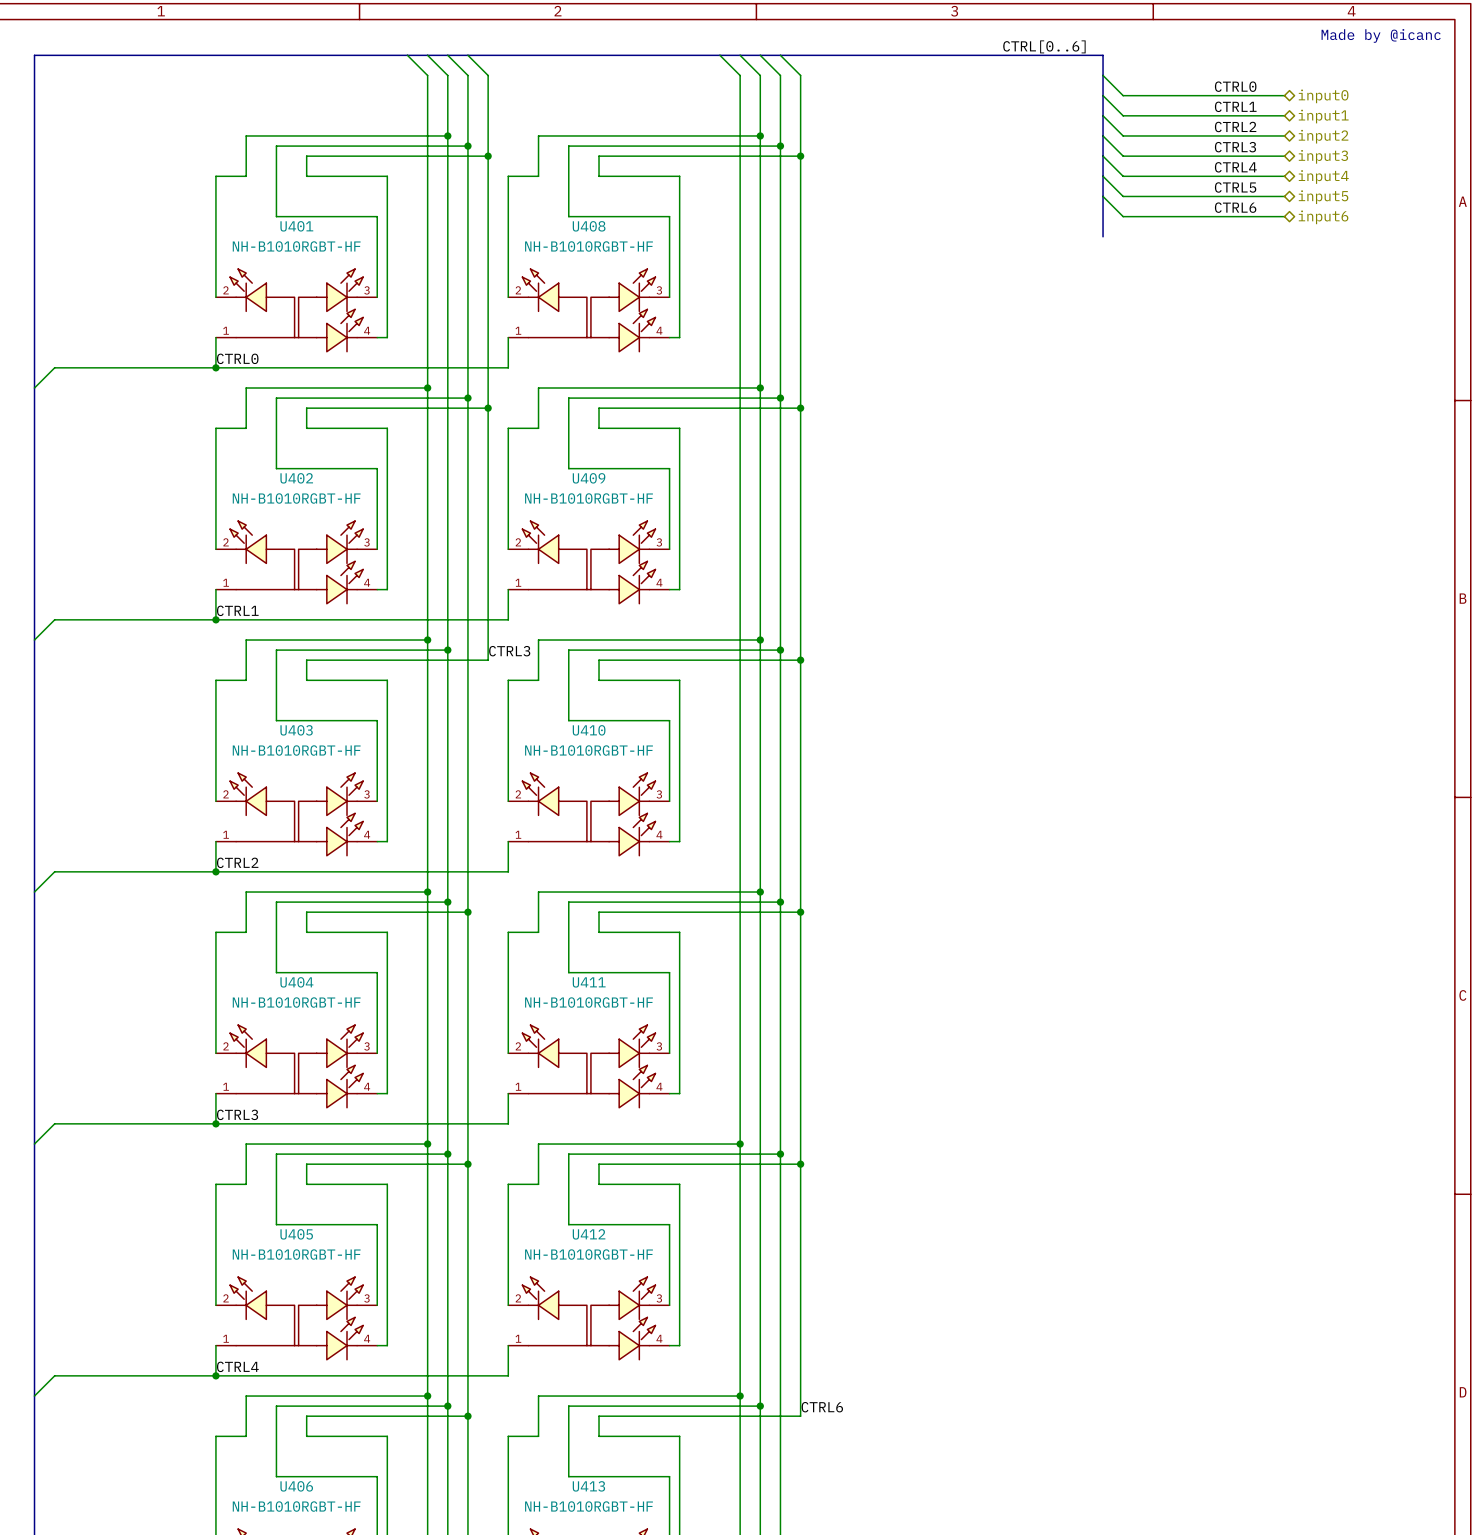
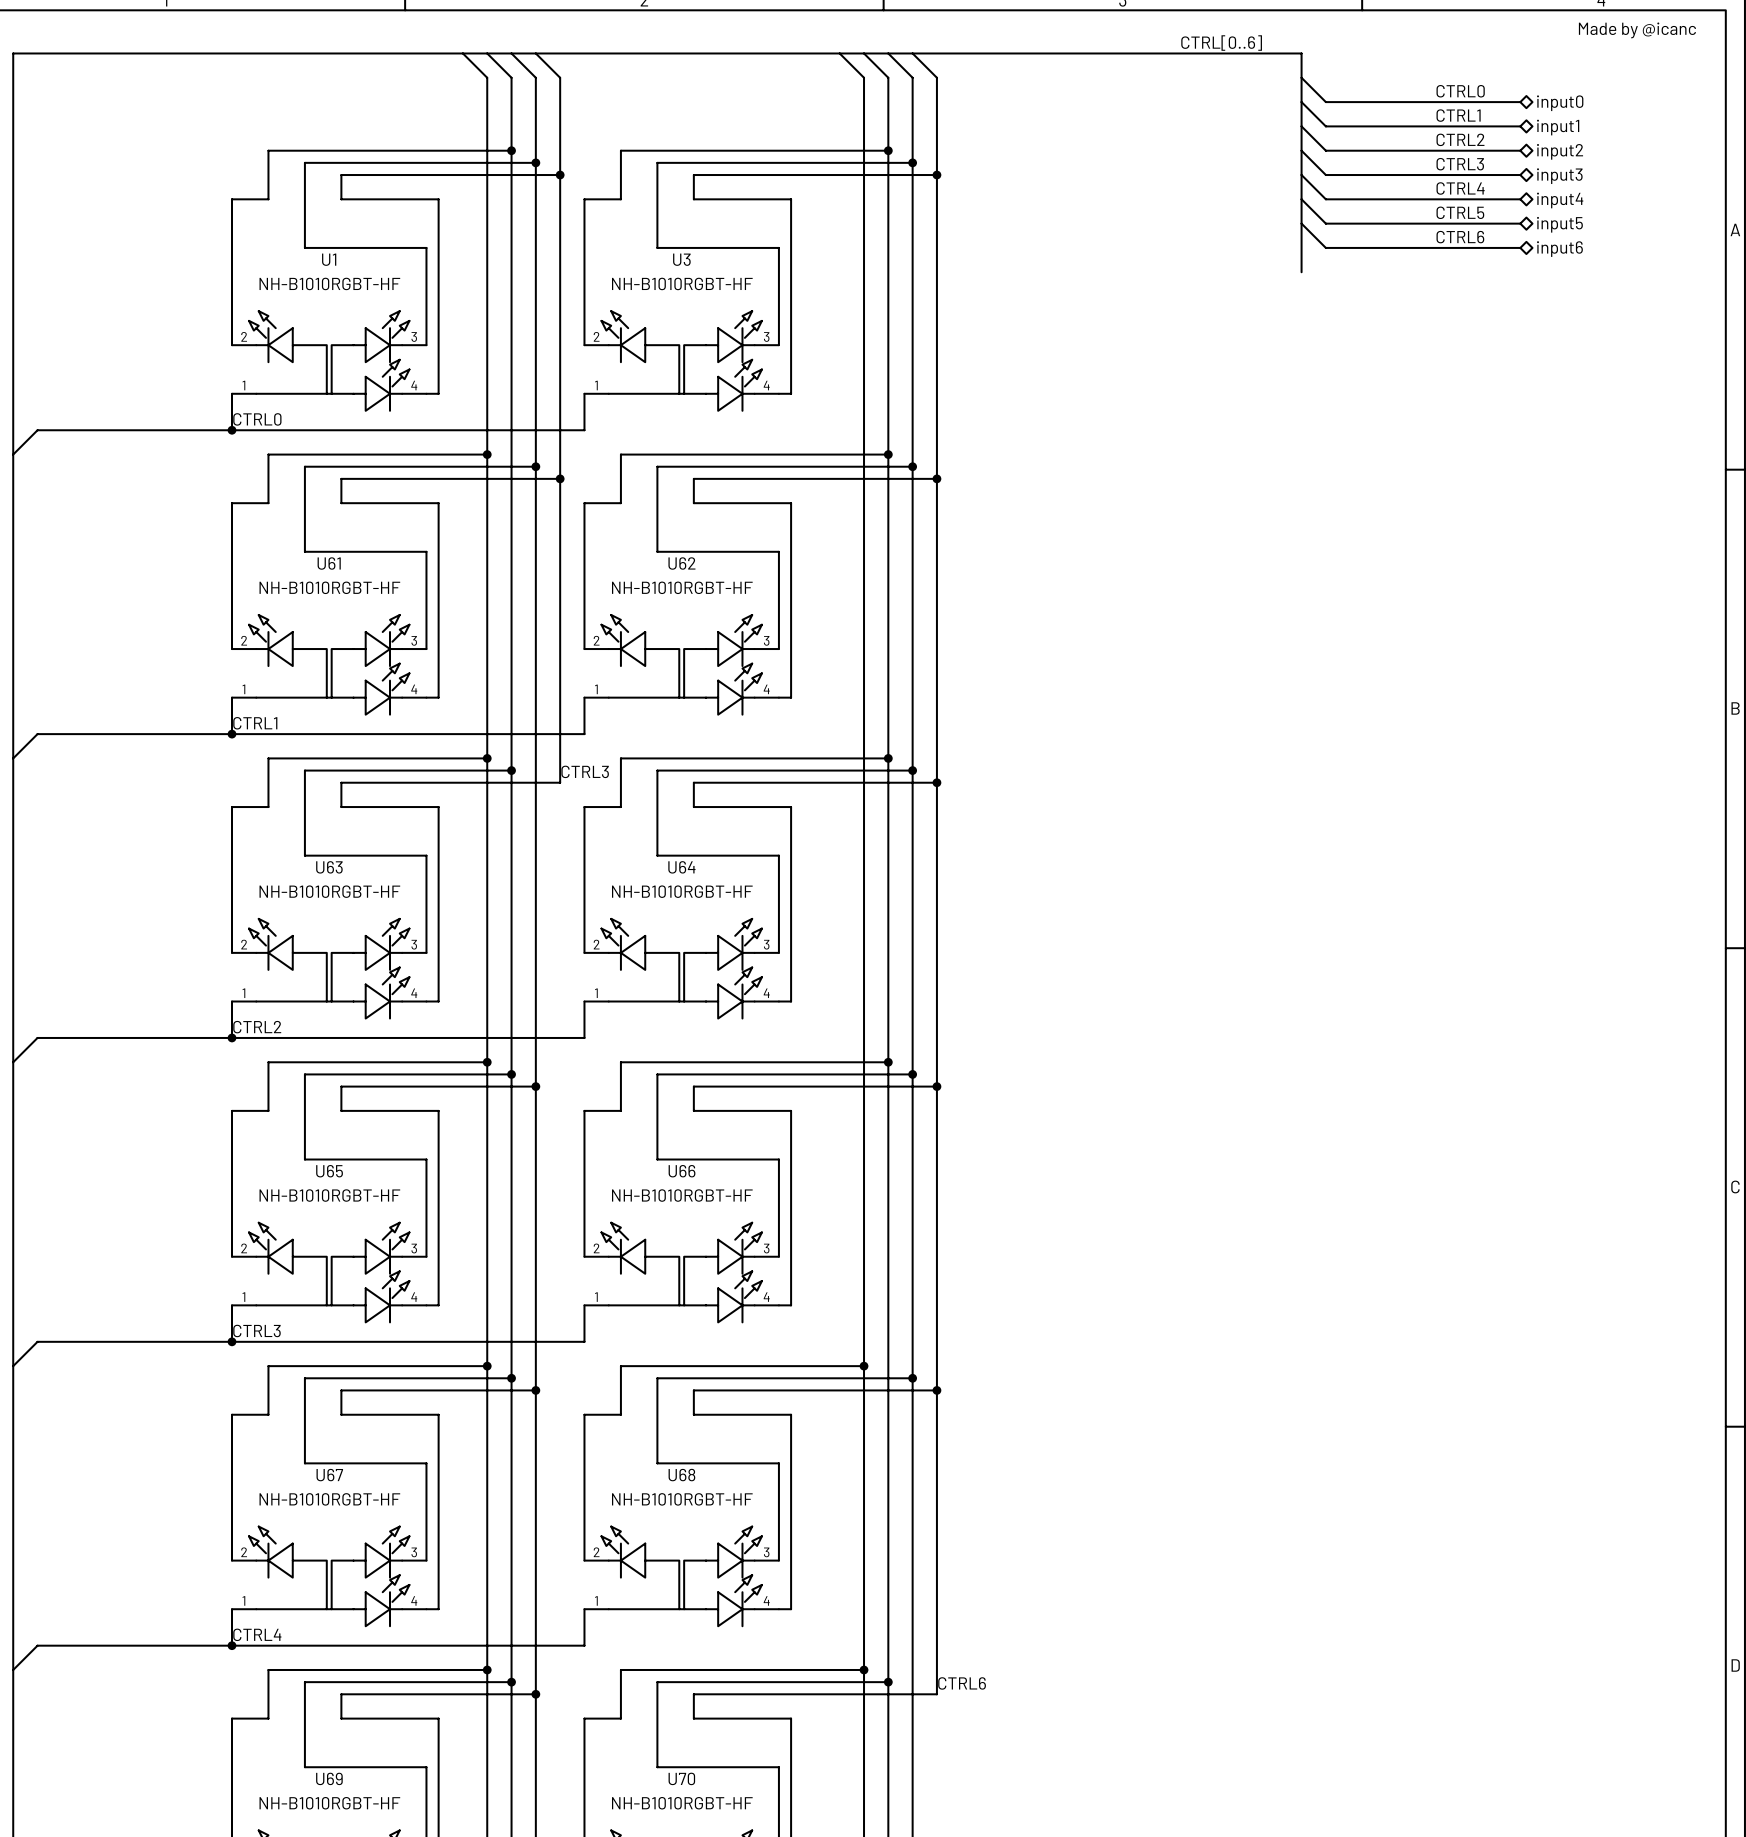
U401 name: U401 (296, 226) -> U1 (329, 259)
U408 name: U408 (589, 226) -> U3 (681, 259)
U402 name: U402 (296, 478) -> U61 (329, 563)
U409 name: U409 (589, 478) -> U62 (681, 563)
U403 name: U403 (296, 730) -> U63 (329, 867)
U410 name: U410 (589, 730) -> U64 (681, 867)
U404 name: U404 (296, 982) -> U65 (329, 1171)
U411 name: U411 (589, 982) -> U66 (682, 1171)
U405 name: U405 (296, 1234) -> U67 (329, 1475)
U412 name: U412 (589, 1234) -> U68 (681, 1475)
U406 name: U406 (296, 1486) -> U69 (329, 1778)
U413 name: U413 (588, 1486) -> U70 (681, 1778)

